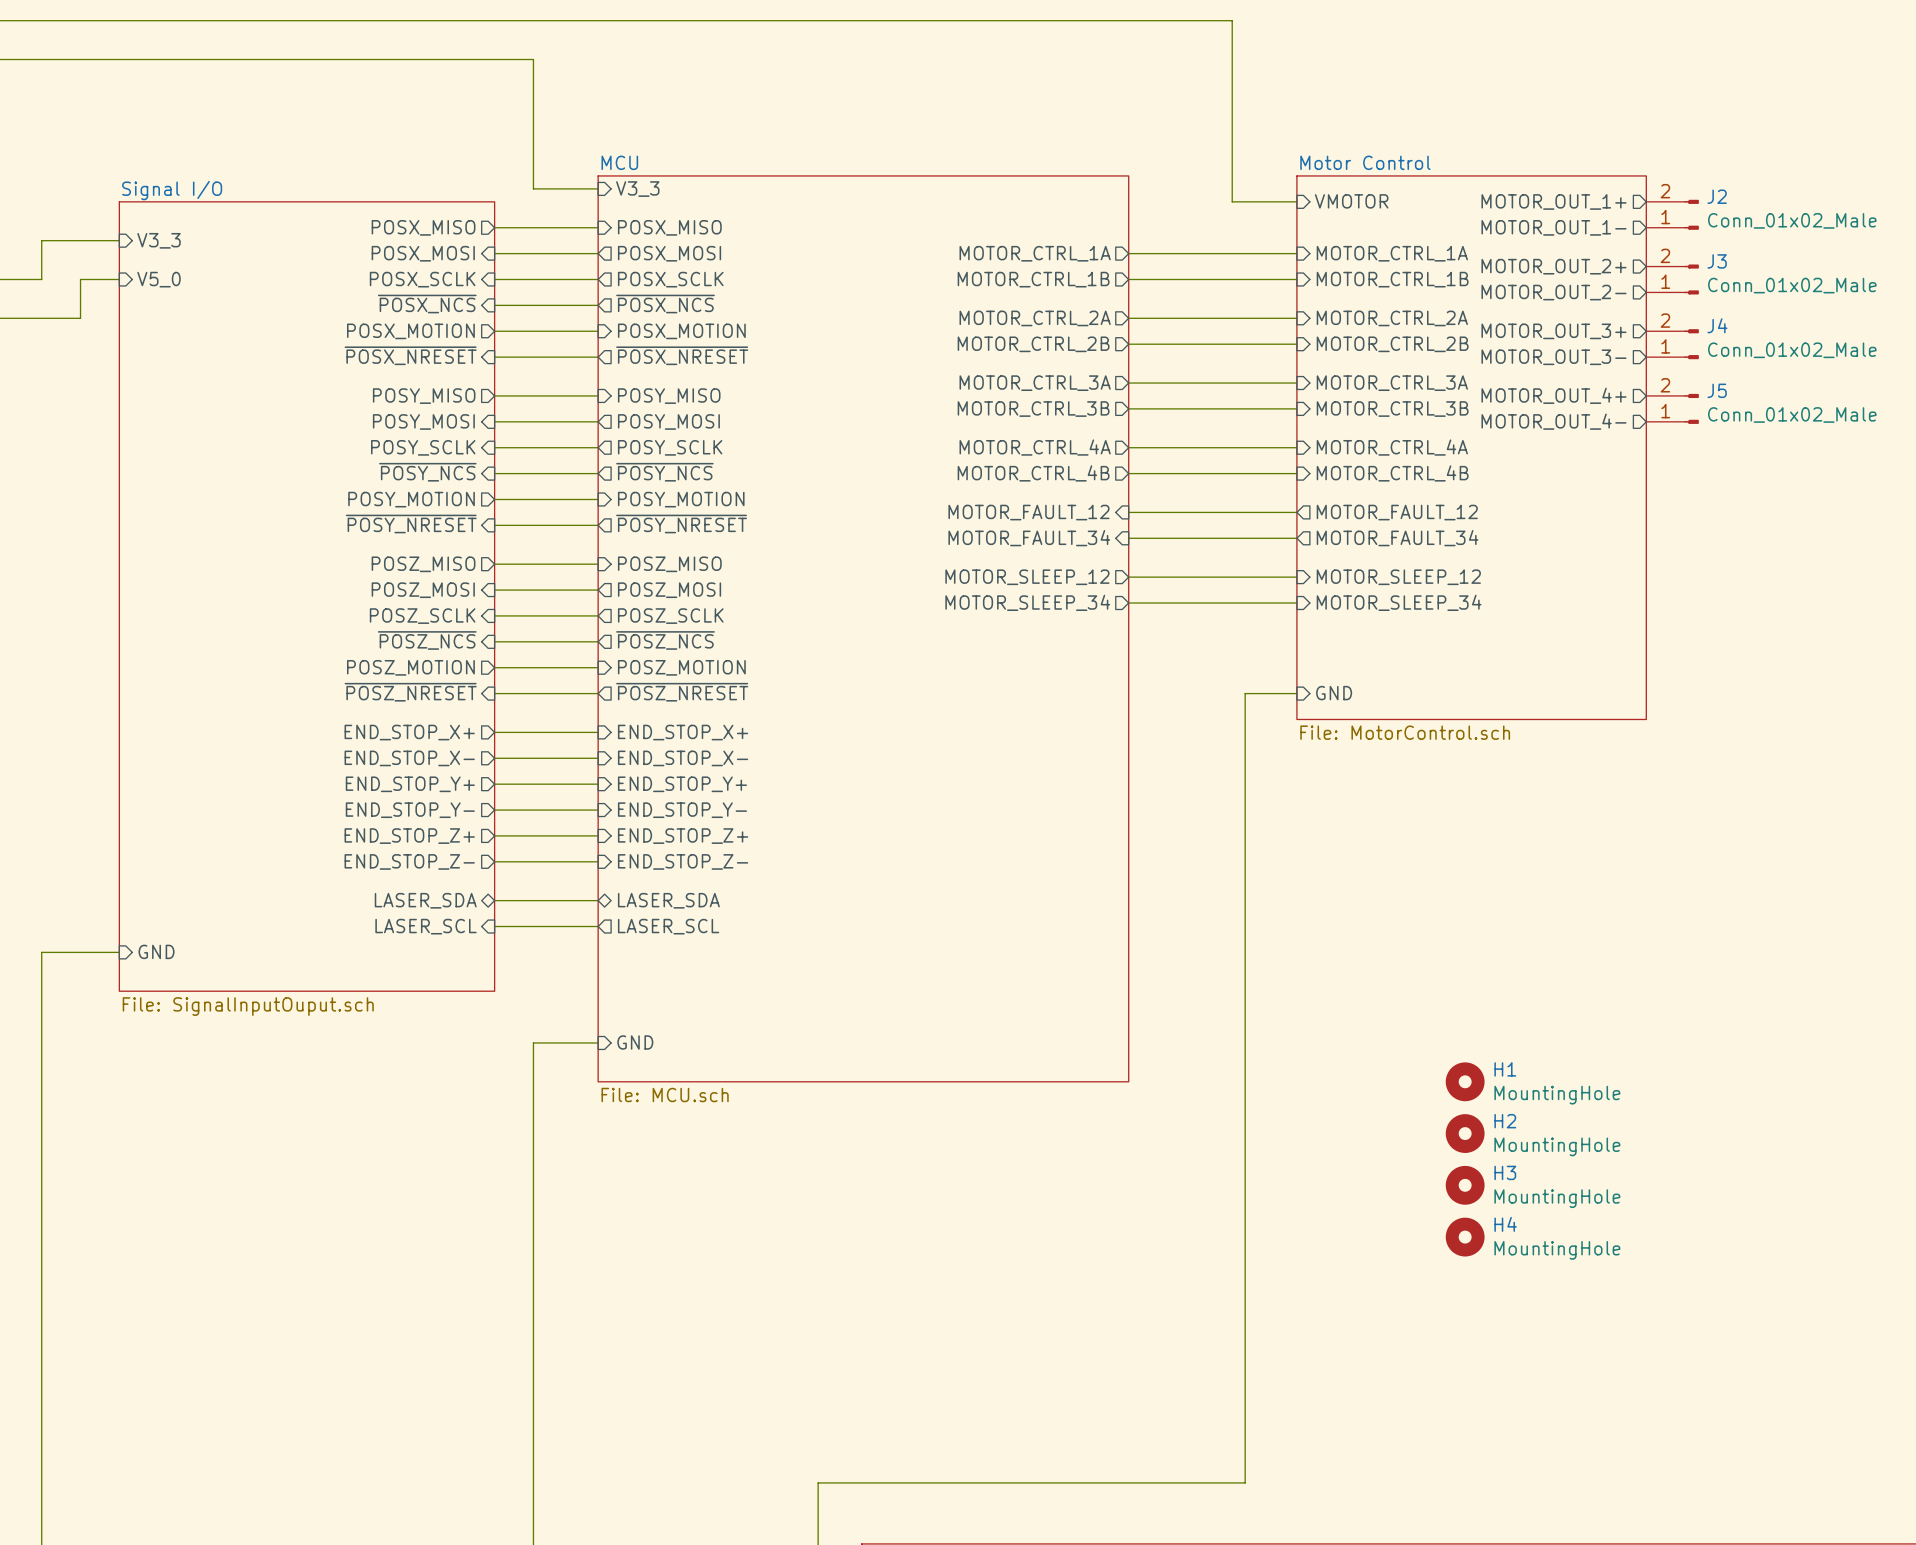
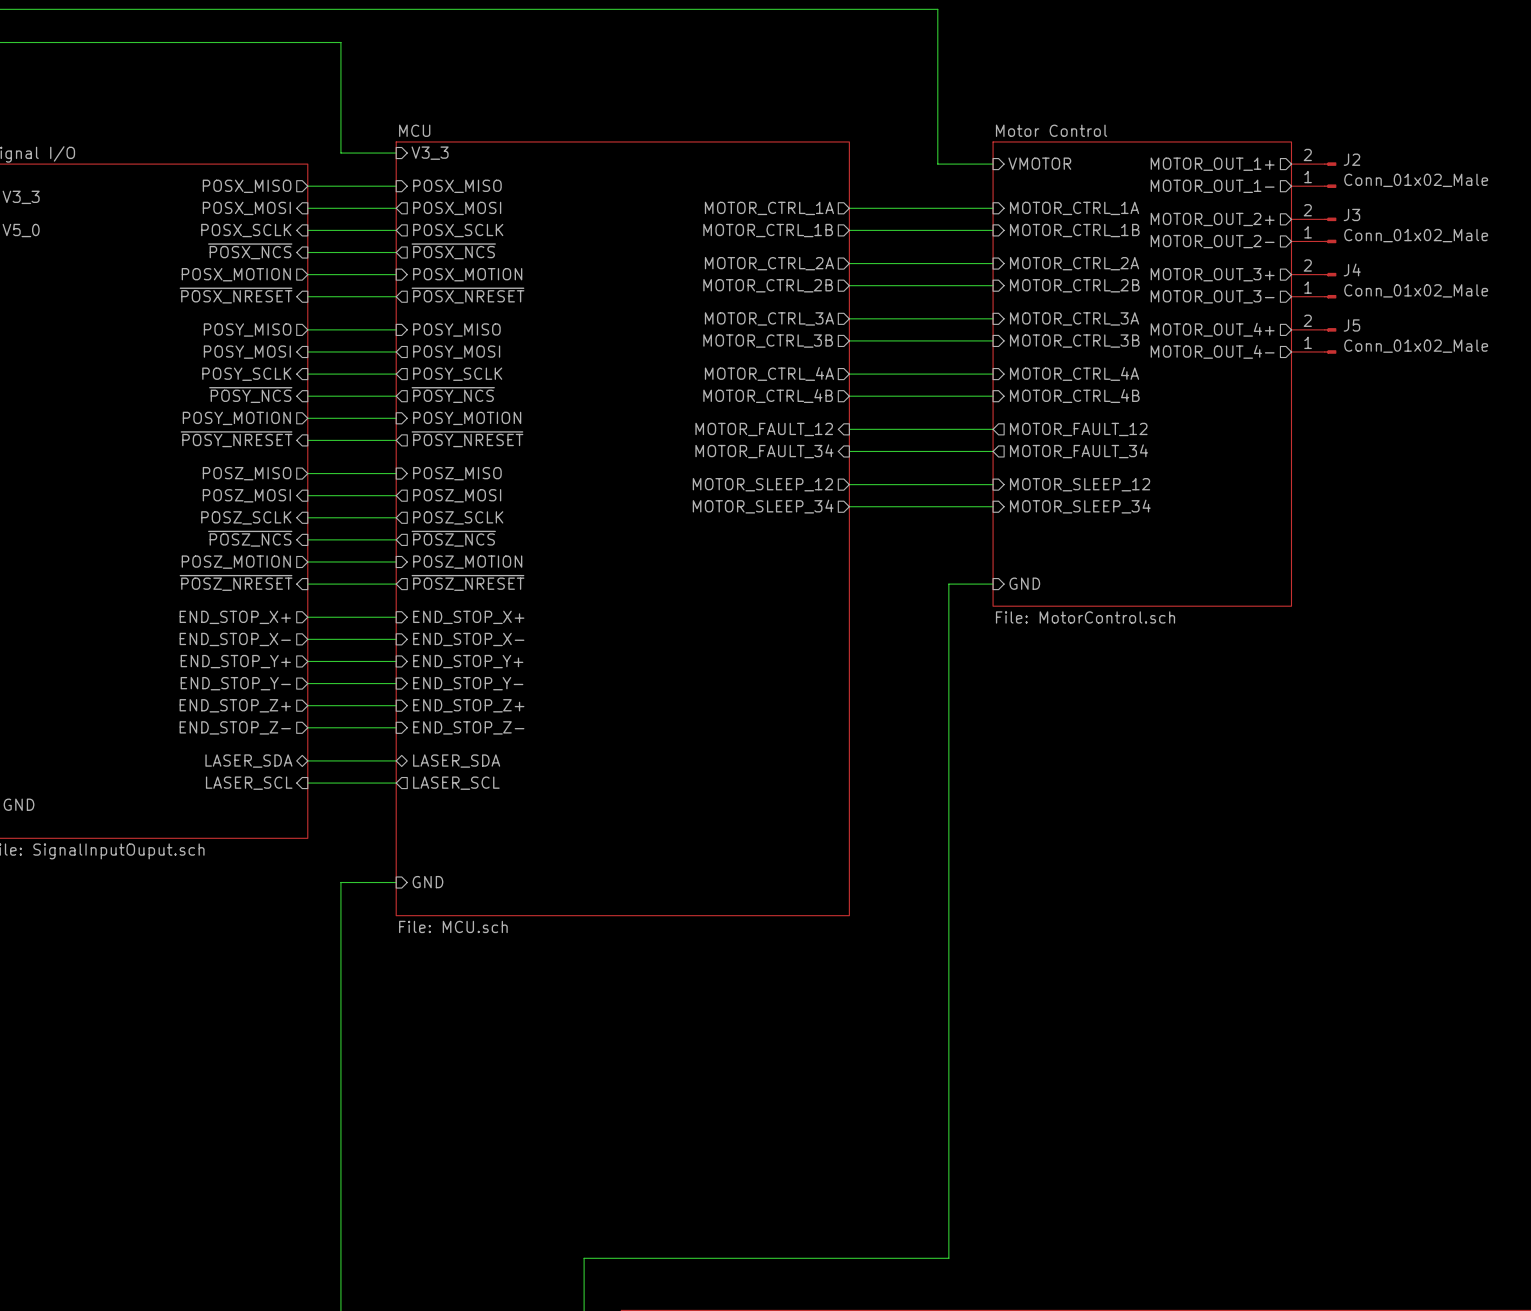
H1: MountingHole (1465, 1081) -> none
H2: MountingHole (1465, 1133) -> none
H3: MountingHole (1465, 1185) -> none
H4: MountingHole (1465, 1237) -> none

